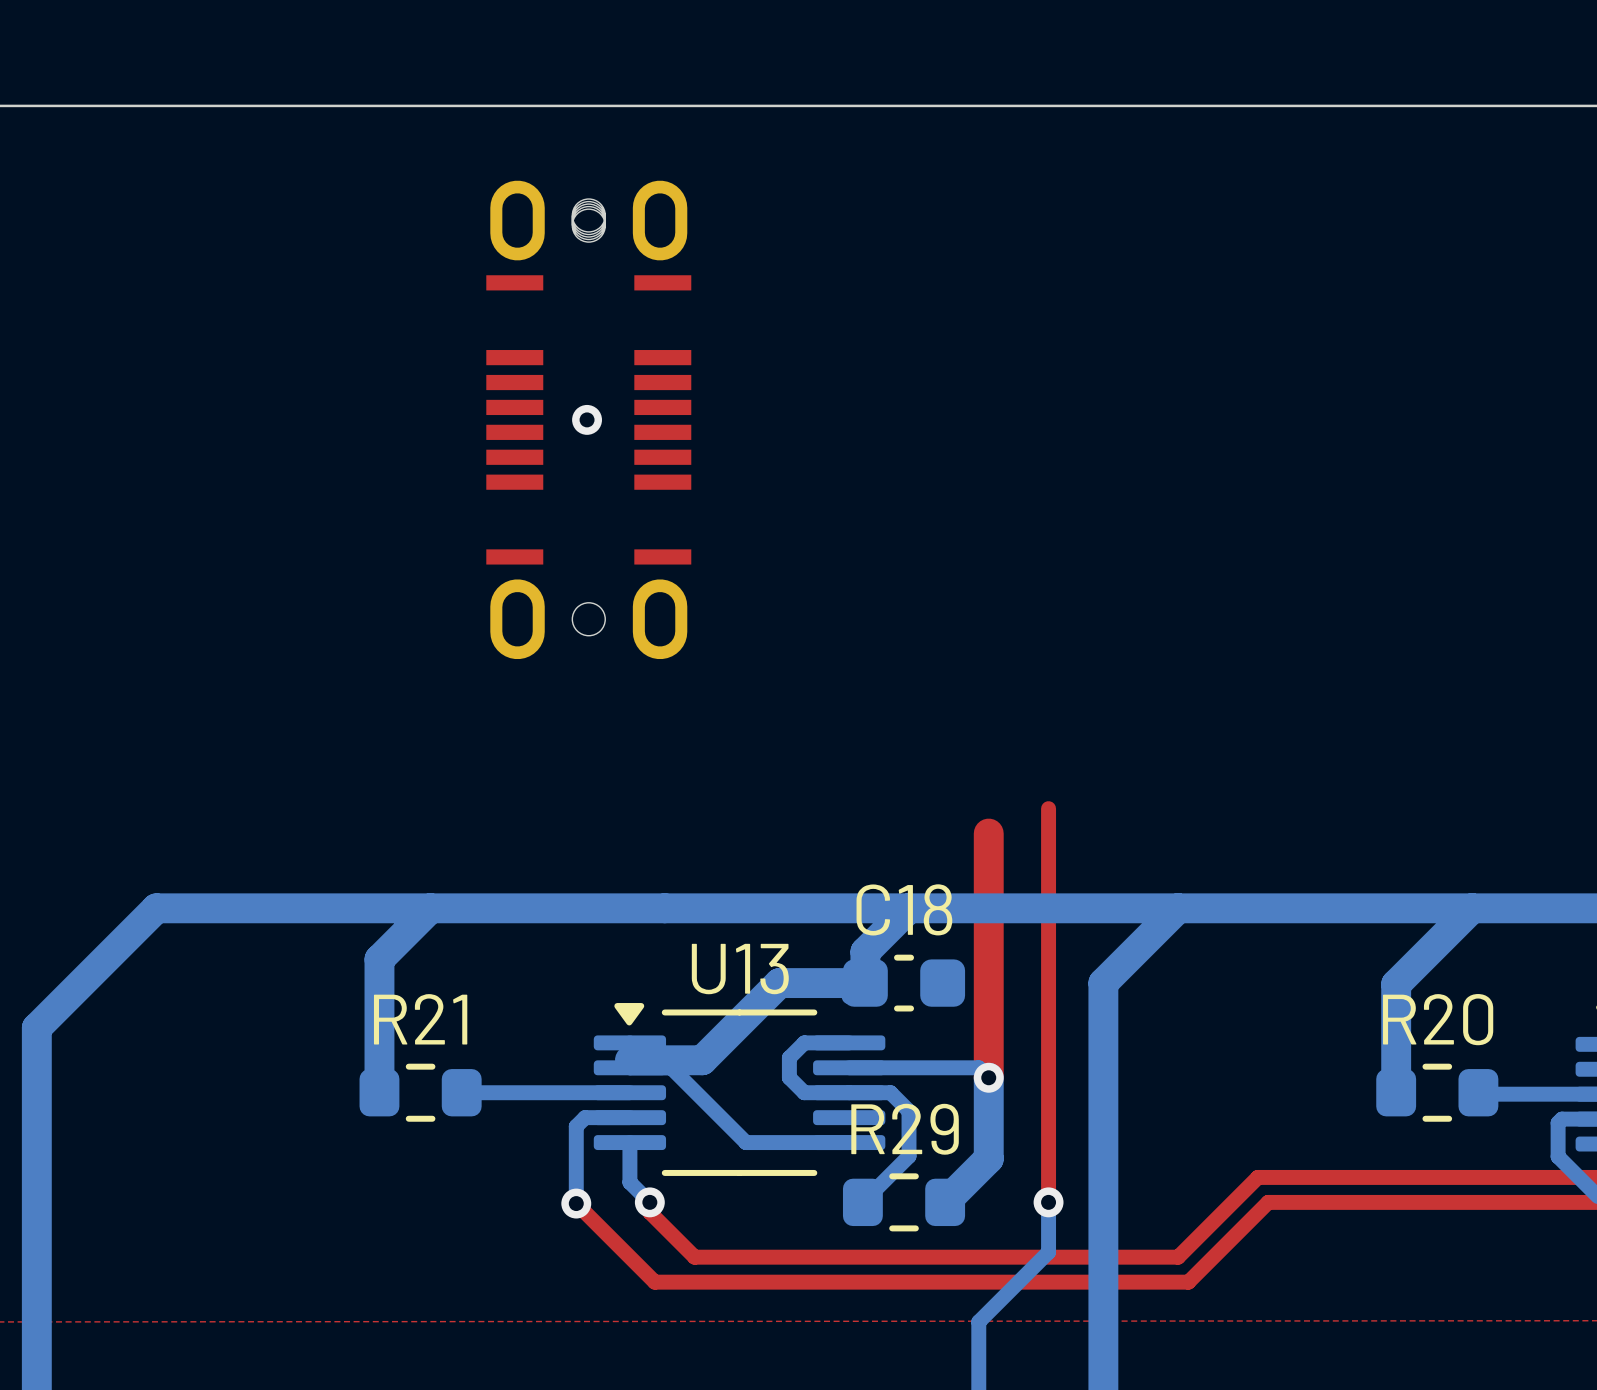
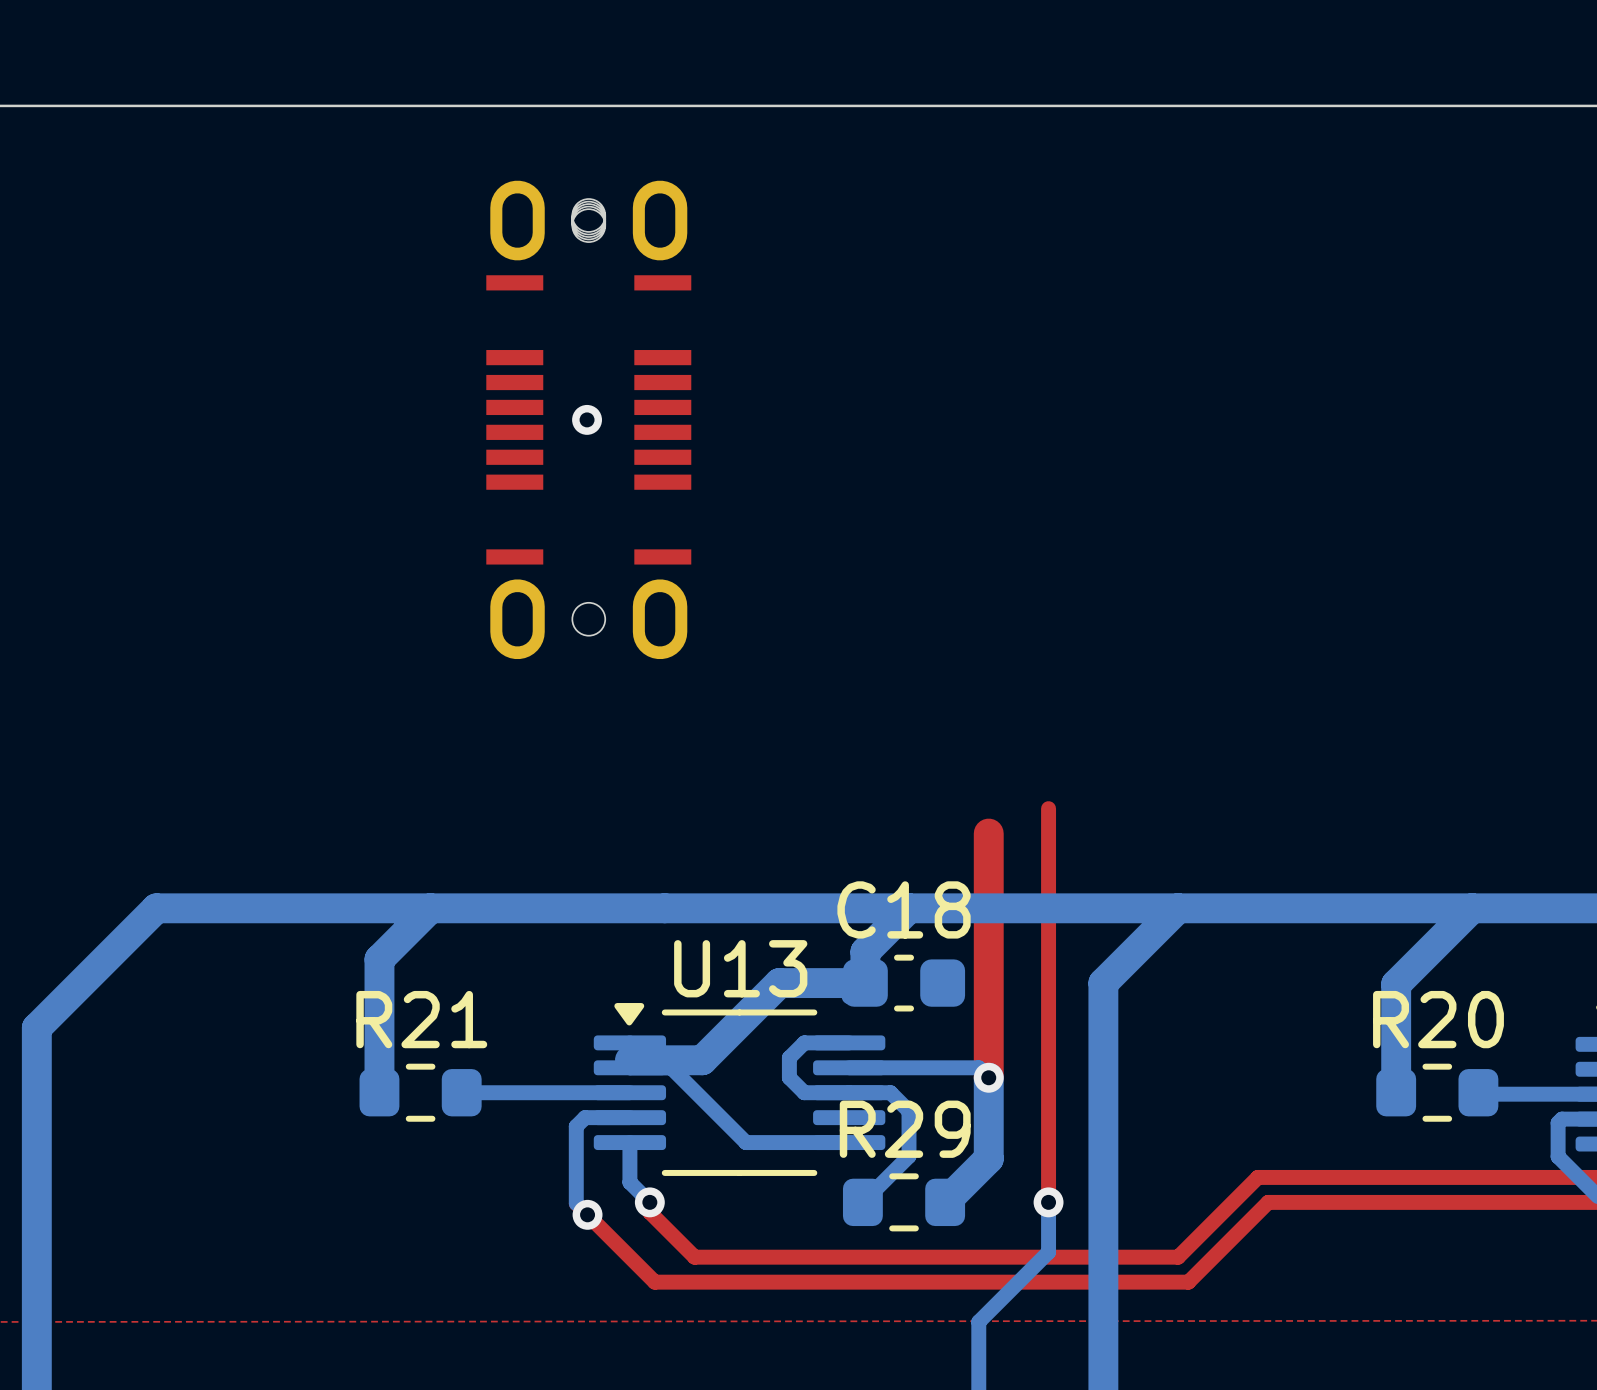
via position: (576, 1203) -> (587, 1214)

